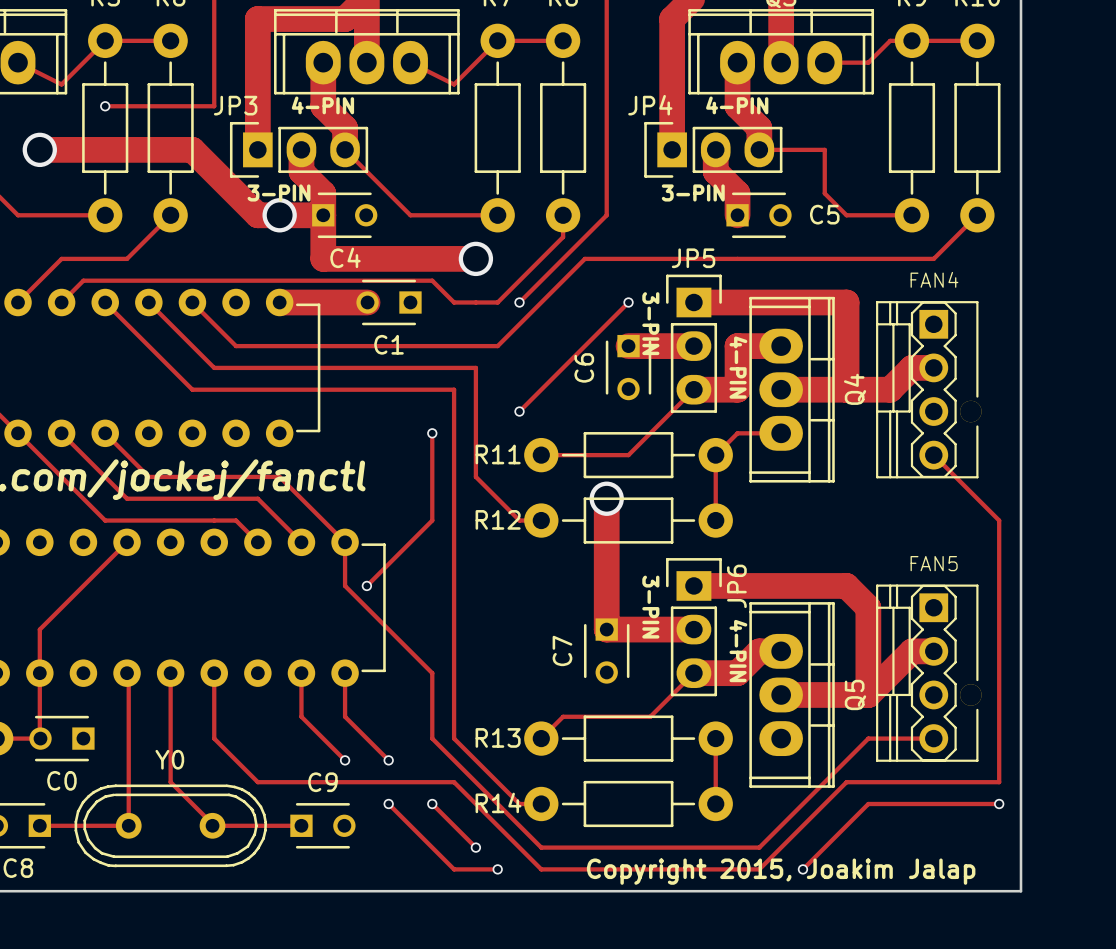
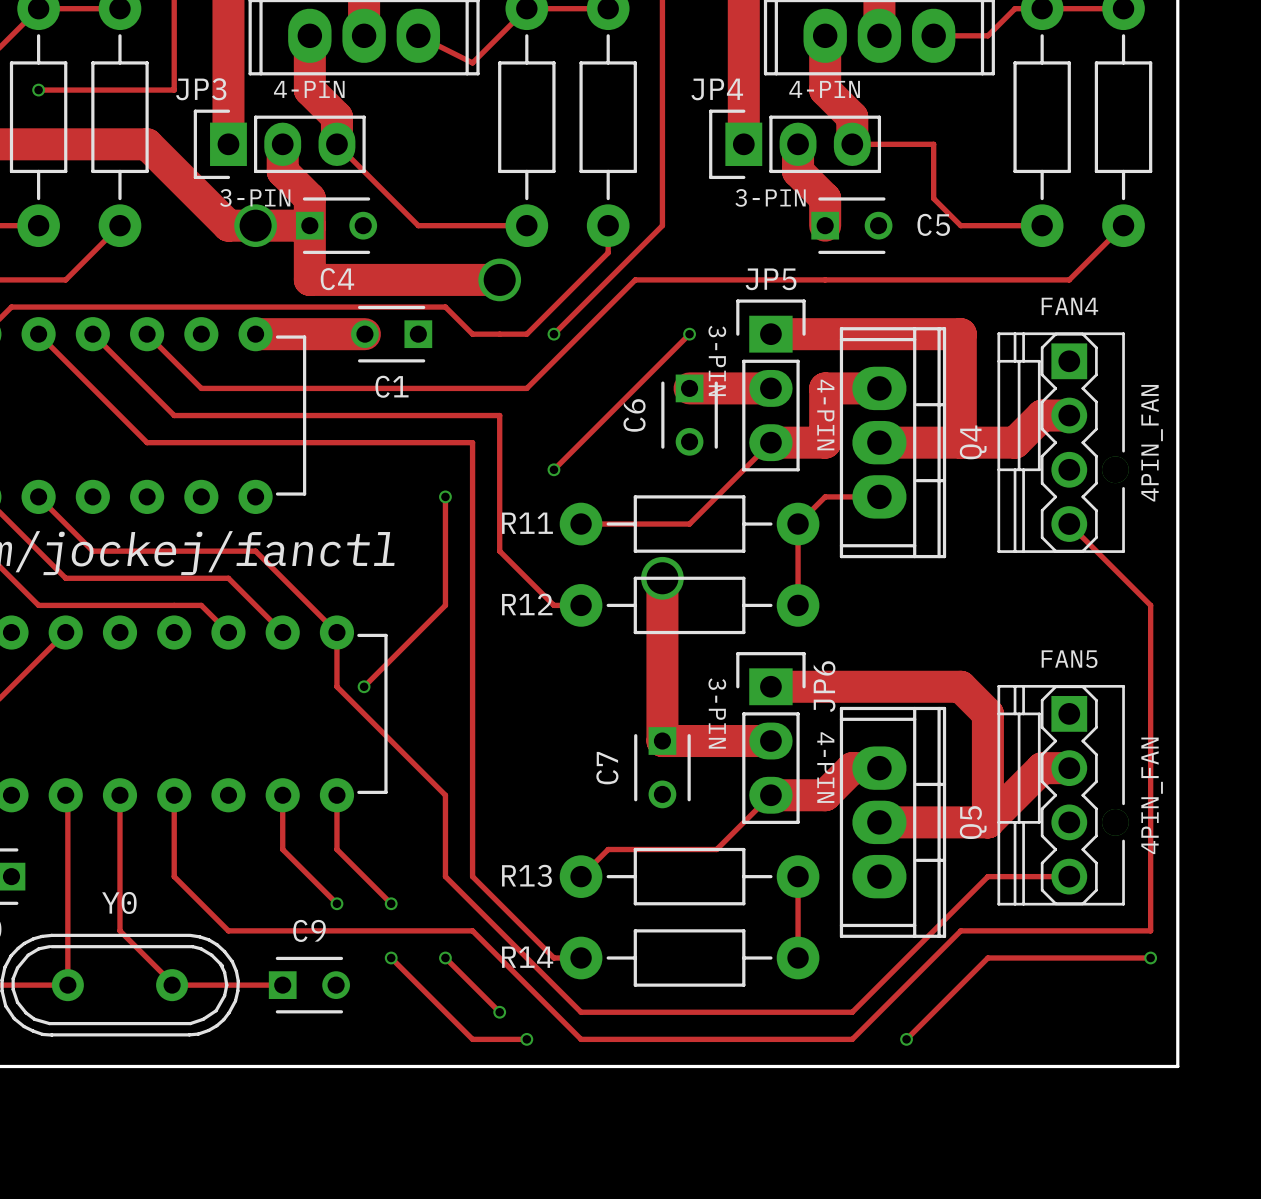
FAN4 value: none -> 4PIN_FAN (1152, 443)
FAN5 value: none -> 4PIN_FAN (1152, 795)
text: Copyright 2015, Joakim Jalap (781, 871) -> none

